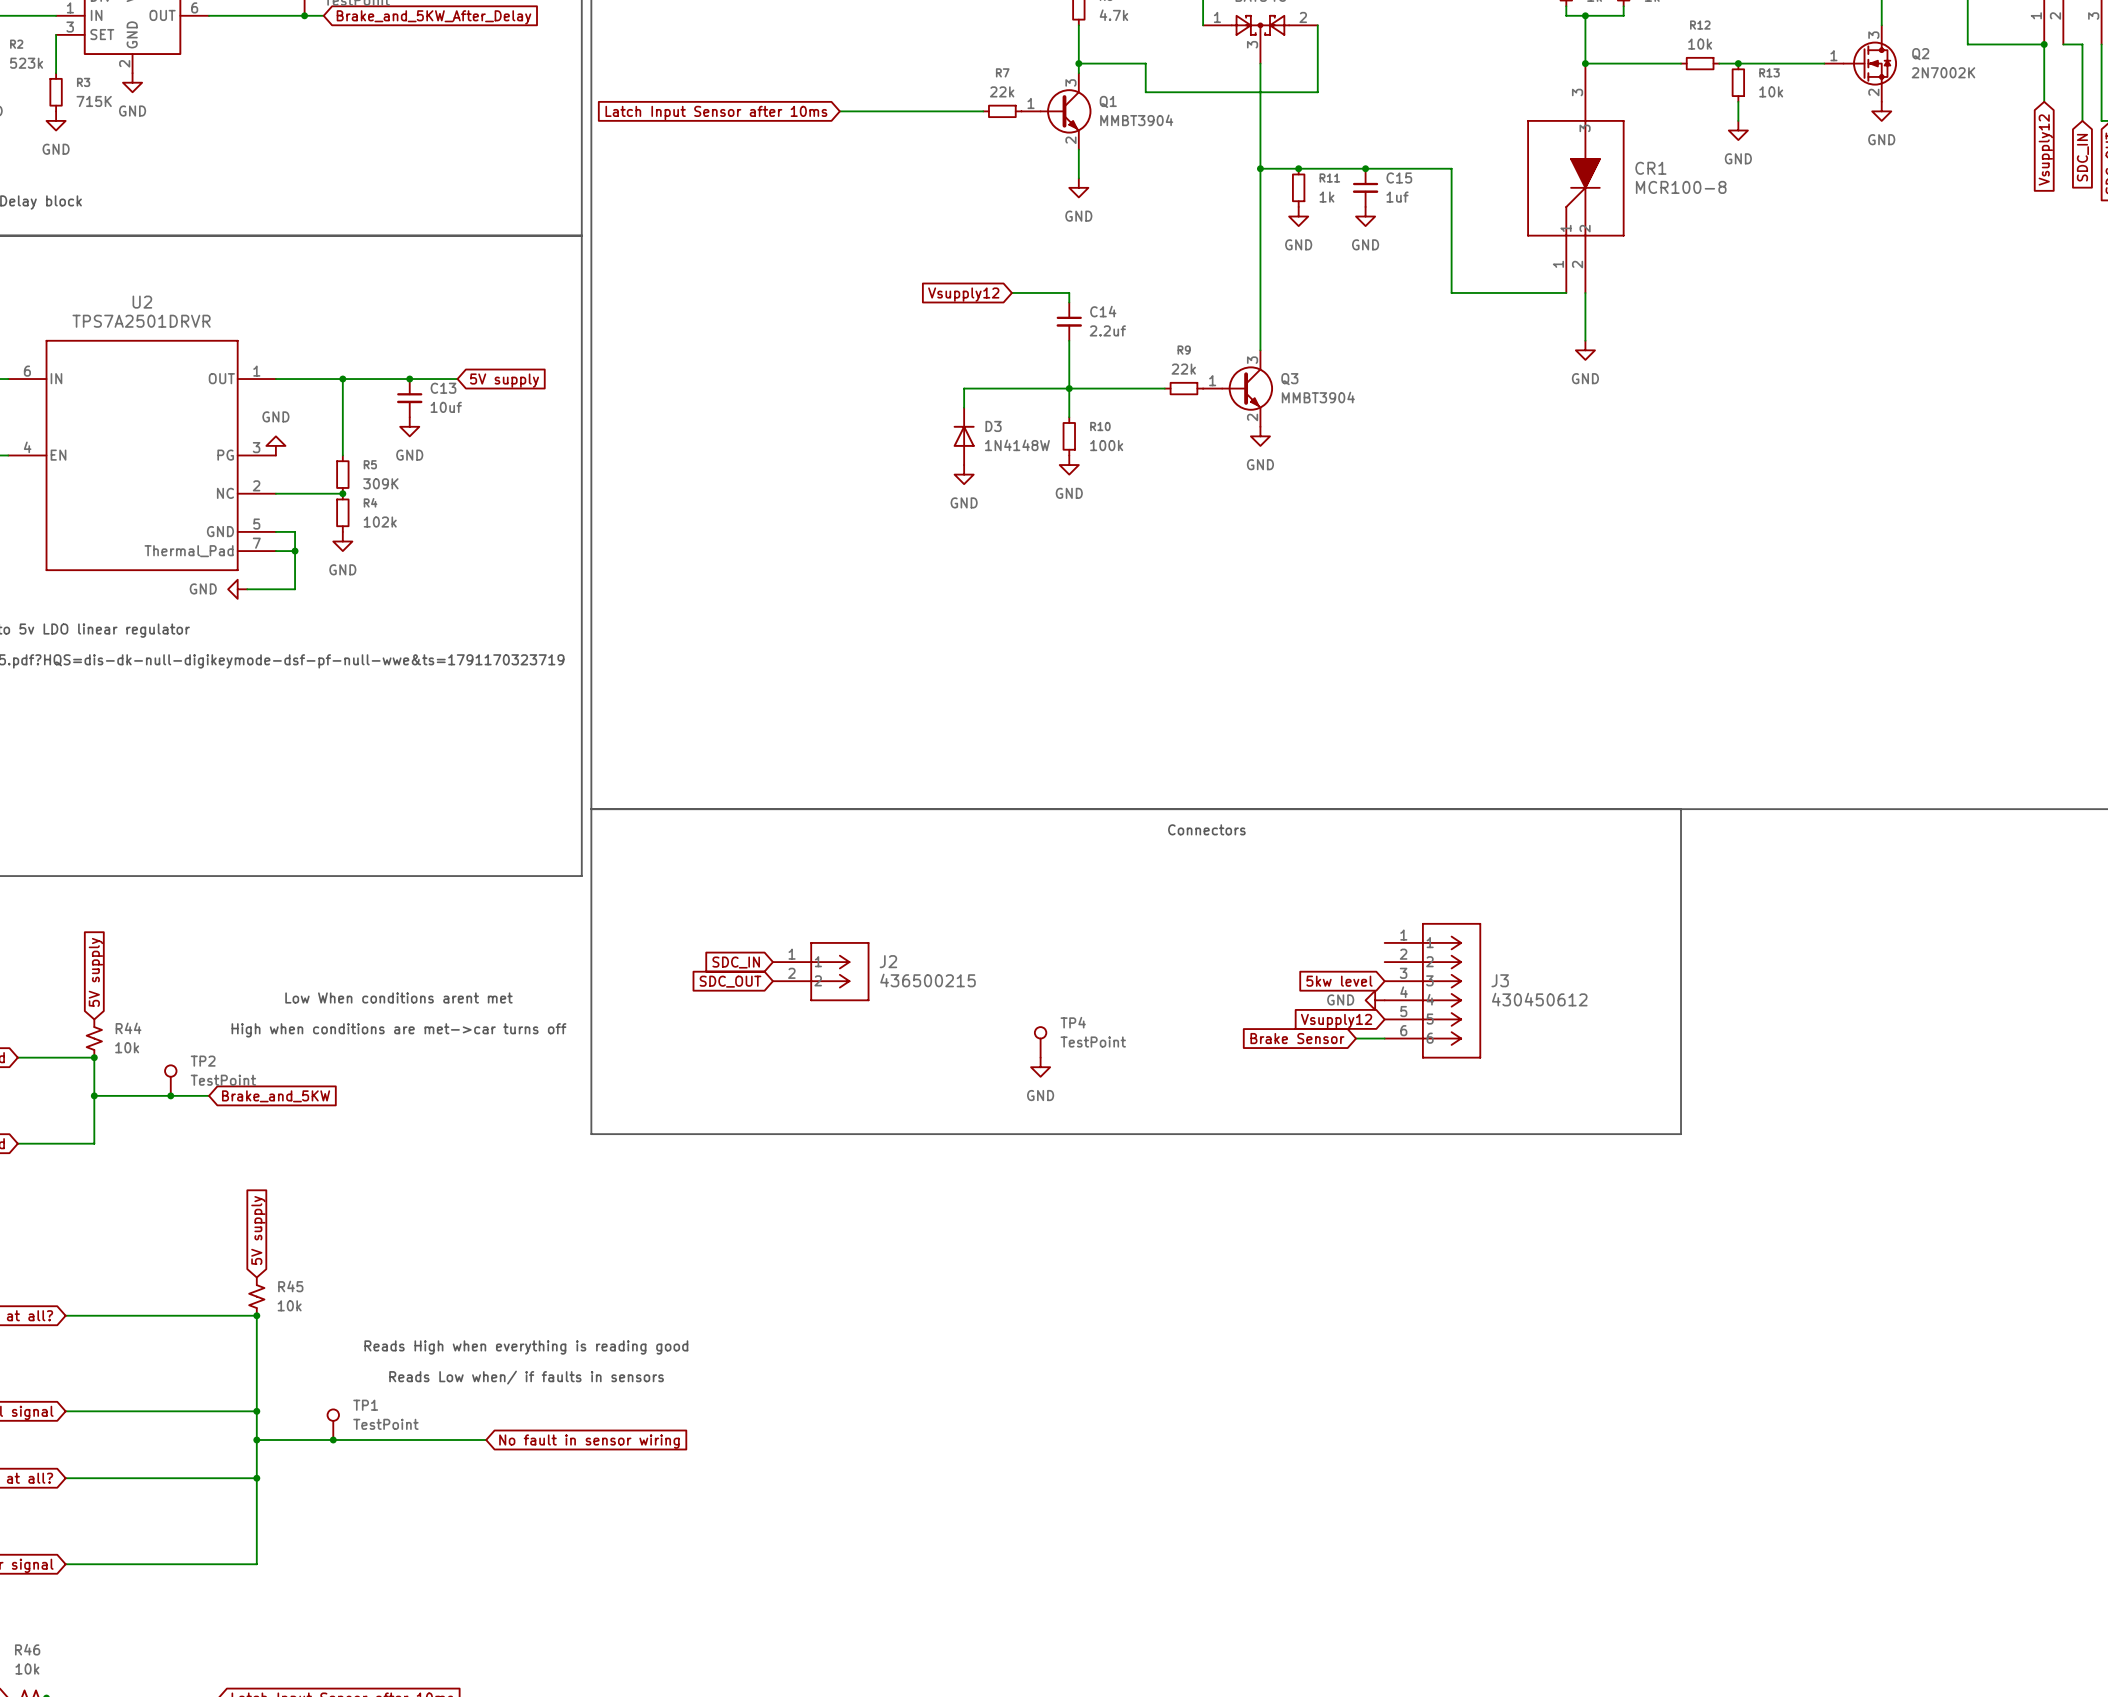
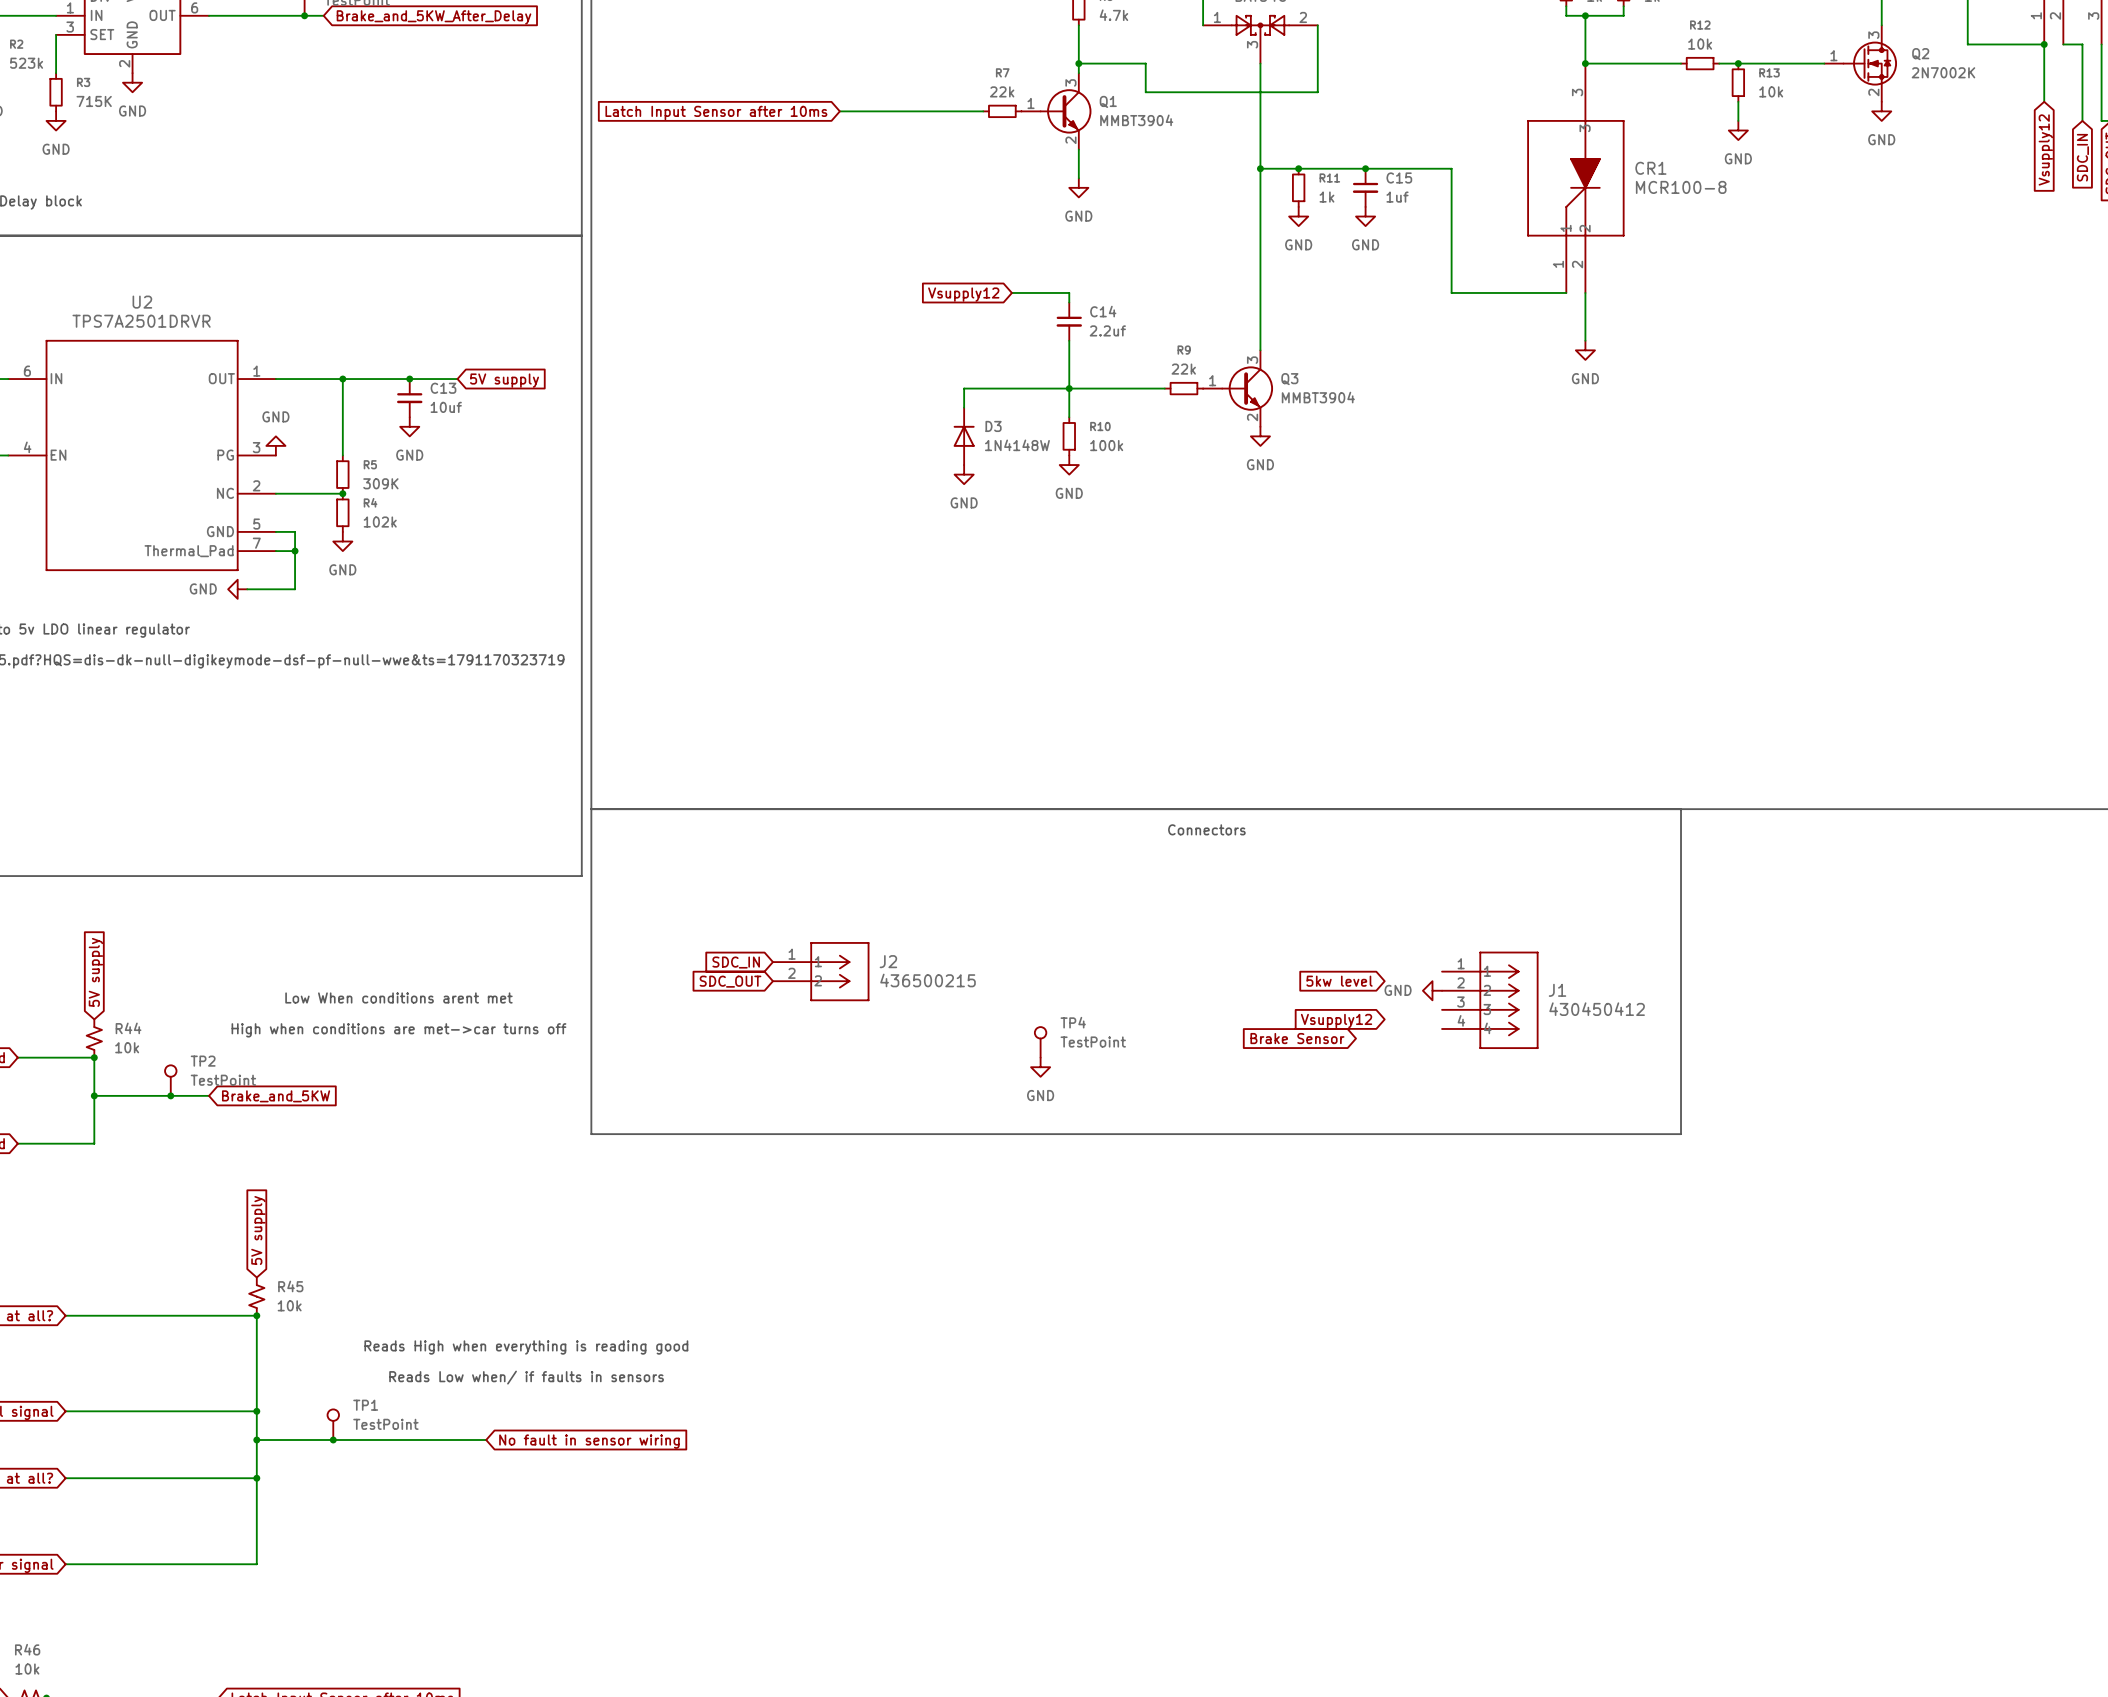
J3: 430450612 (1432, 990) -> none
power symbol position: GND (1375, 1000) -> GND (1432, 990)
J1: none -> 430450412 (1490, 1000)
wire: (1356, 1038) (1384, 1038) -> none

